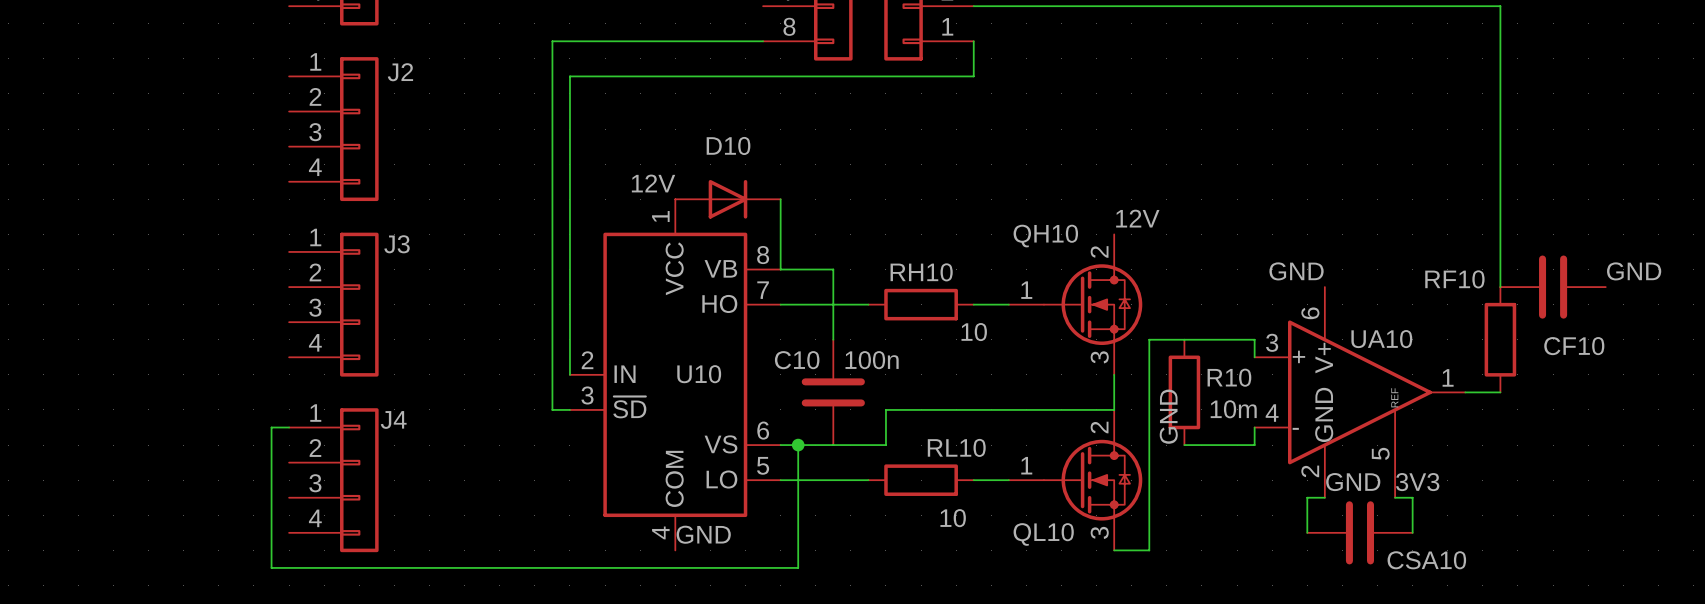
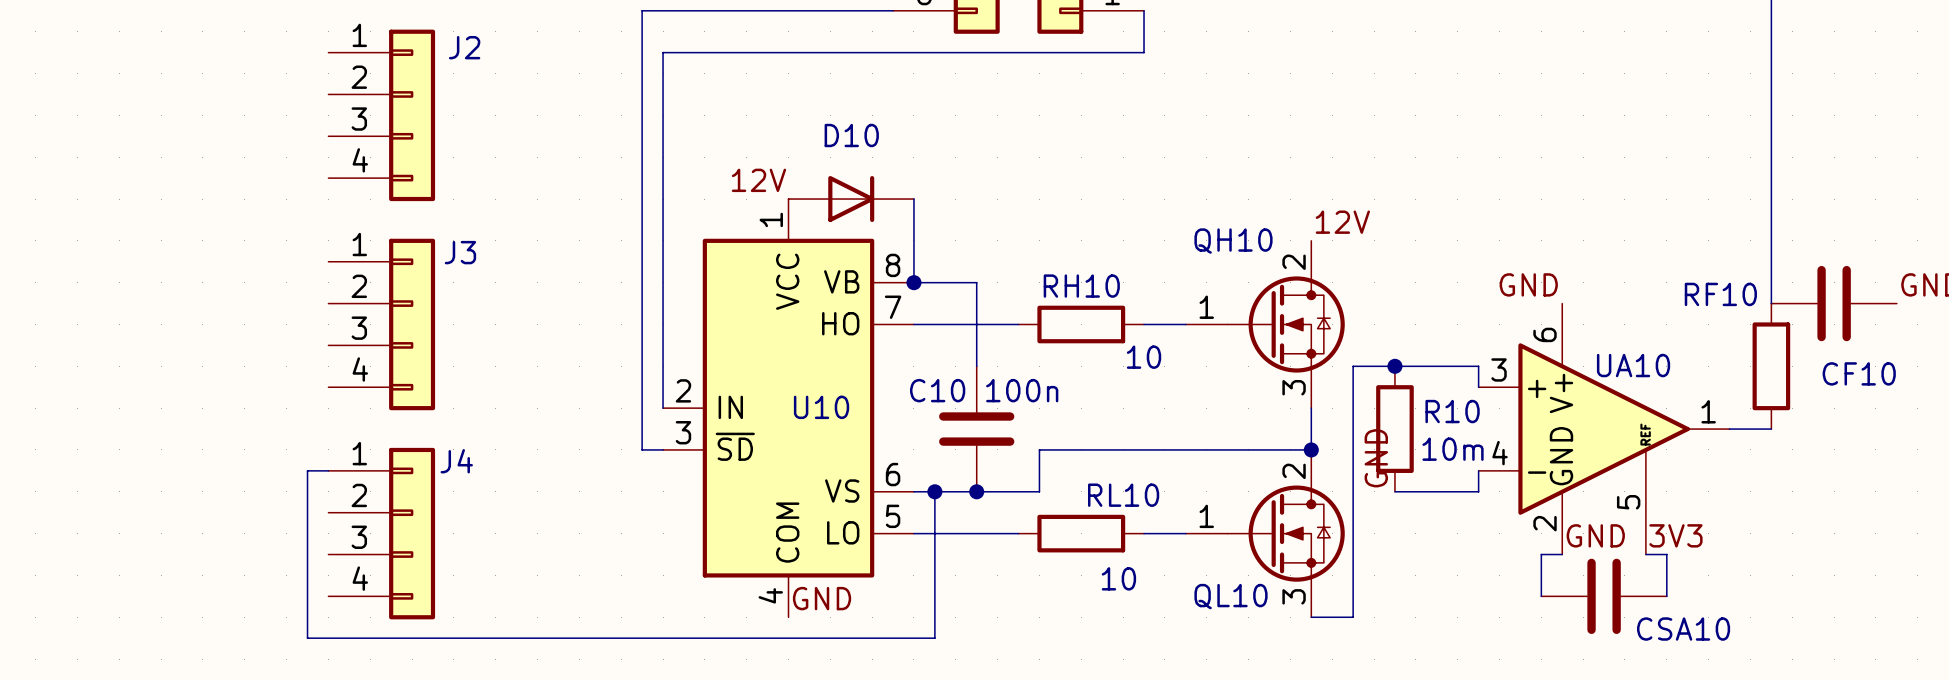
junction: none -> (913, 282)
junction: none -> (1394, 366)
junction: none -> (1311, 449)
junction: none -> (976, 491)

